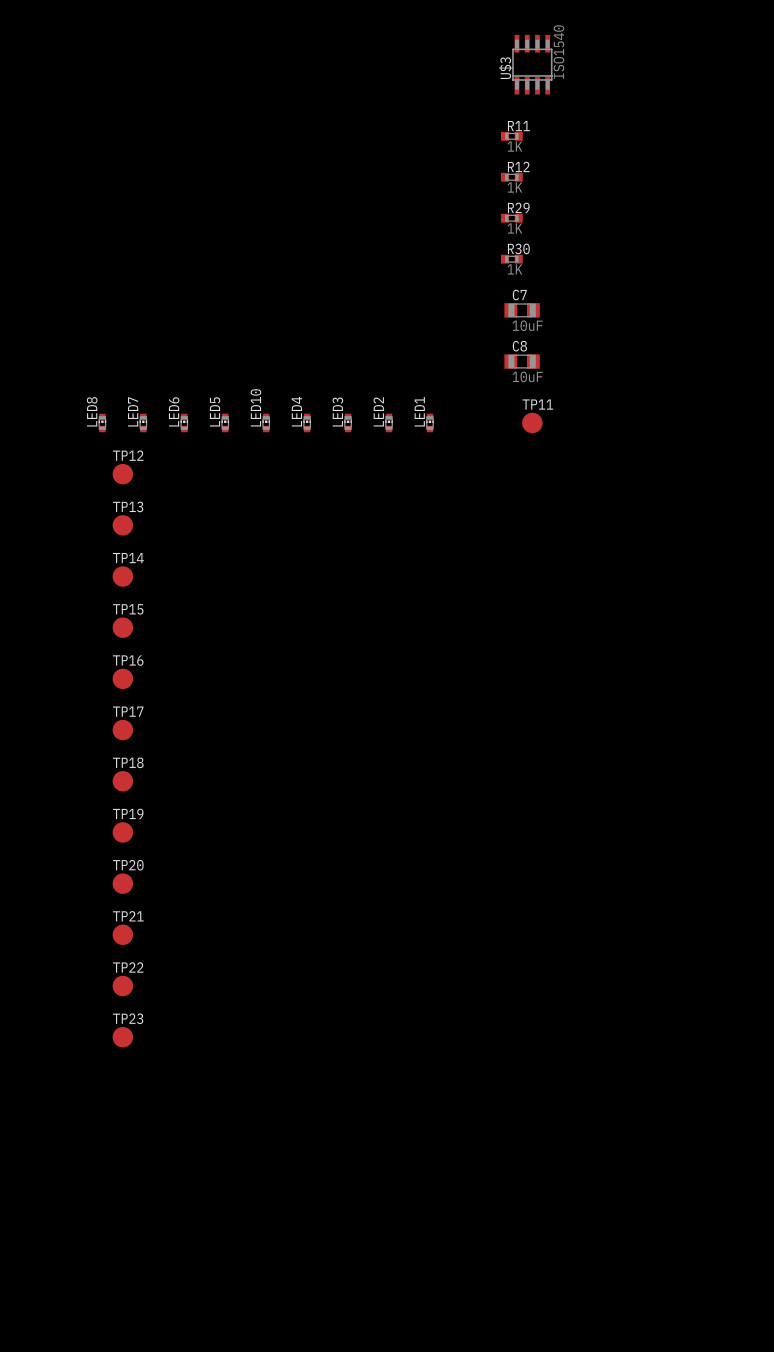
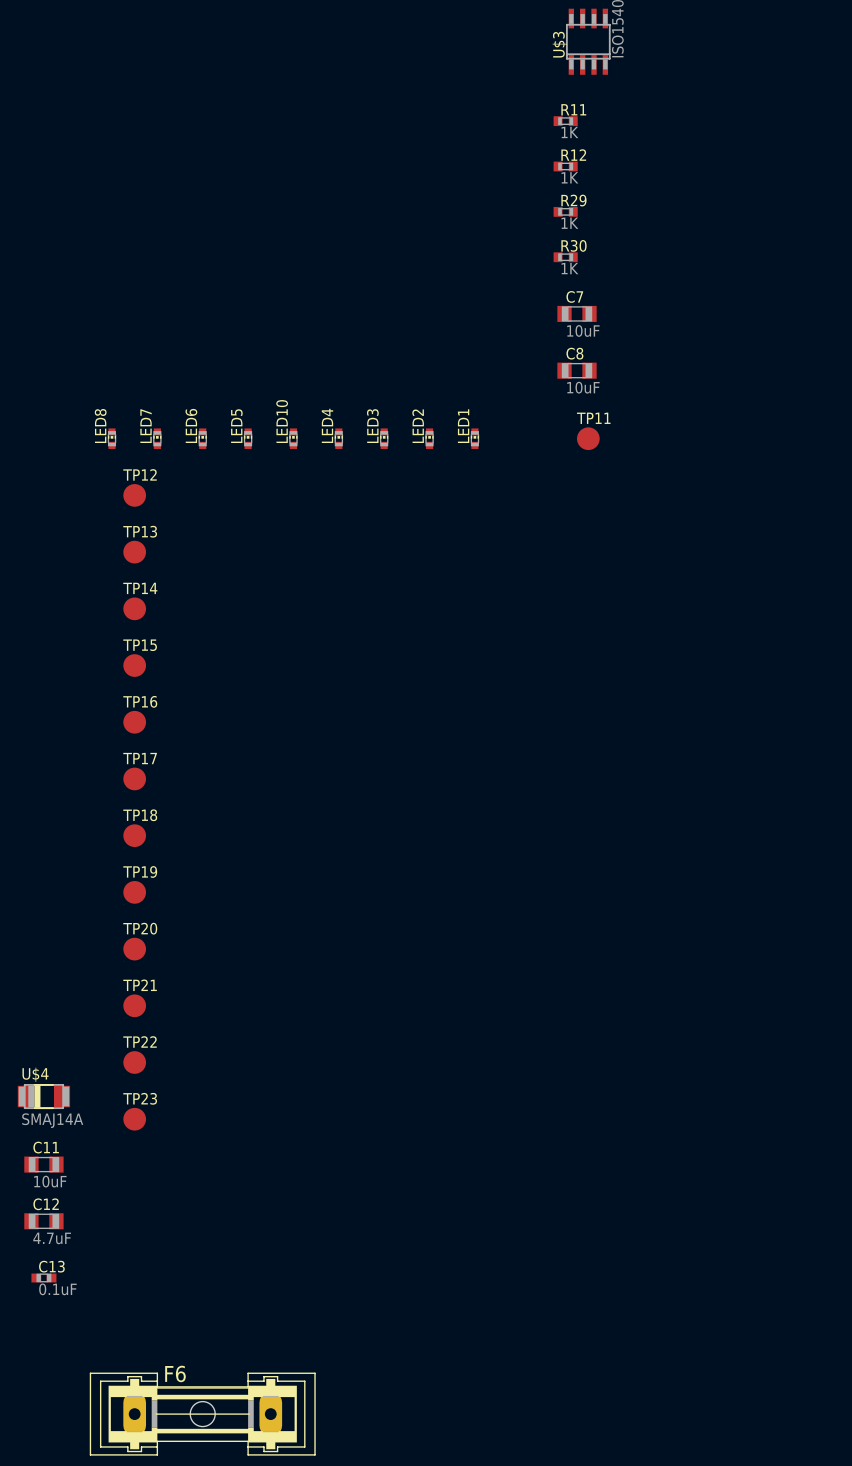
U$4: none -> SMAJ14A (43, 1096)
C11: none -> 10uF (43, 1164)
C12: none -> 4.7uF (43, 1221)
C13: none -> 0.1uF (43, 1277)
F6: none -> (202, 1414)

